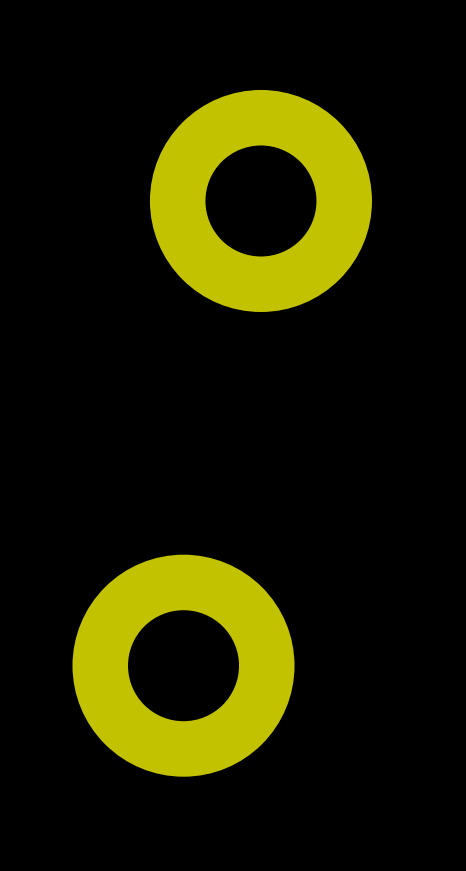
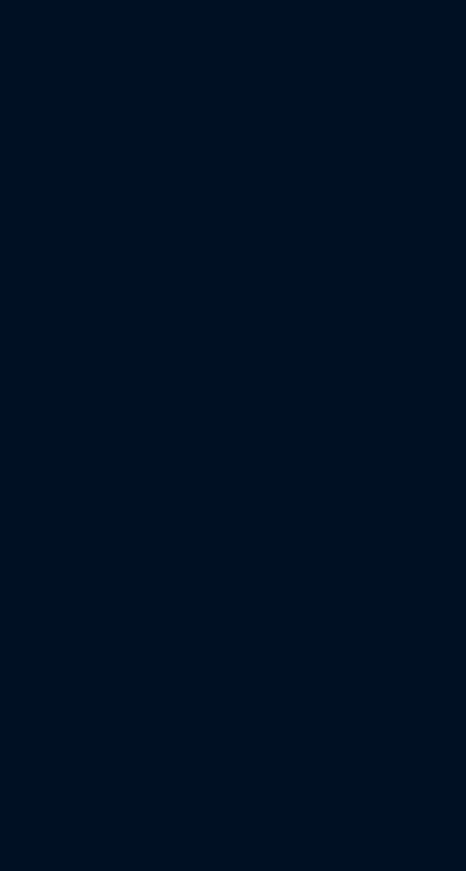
part: (260, 200) -> none
part: (183, 665) -> none

